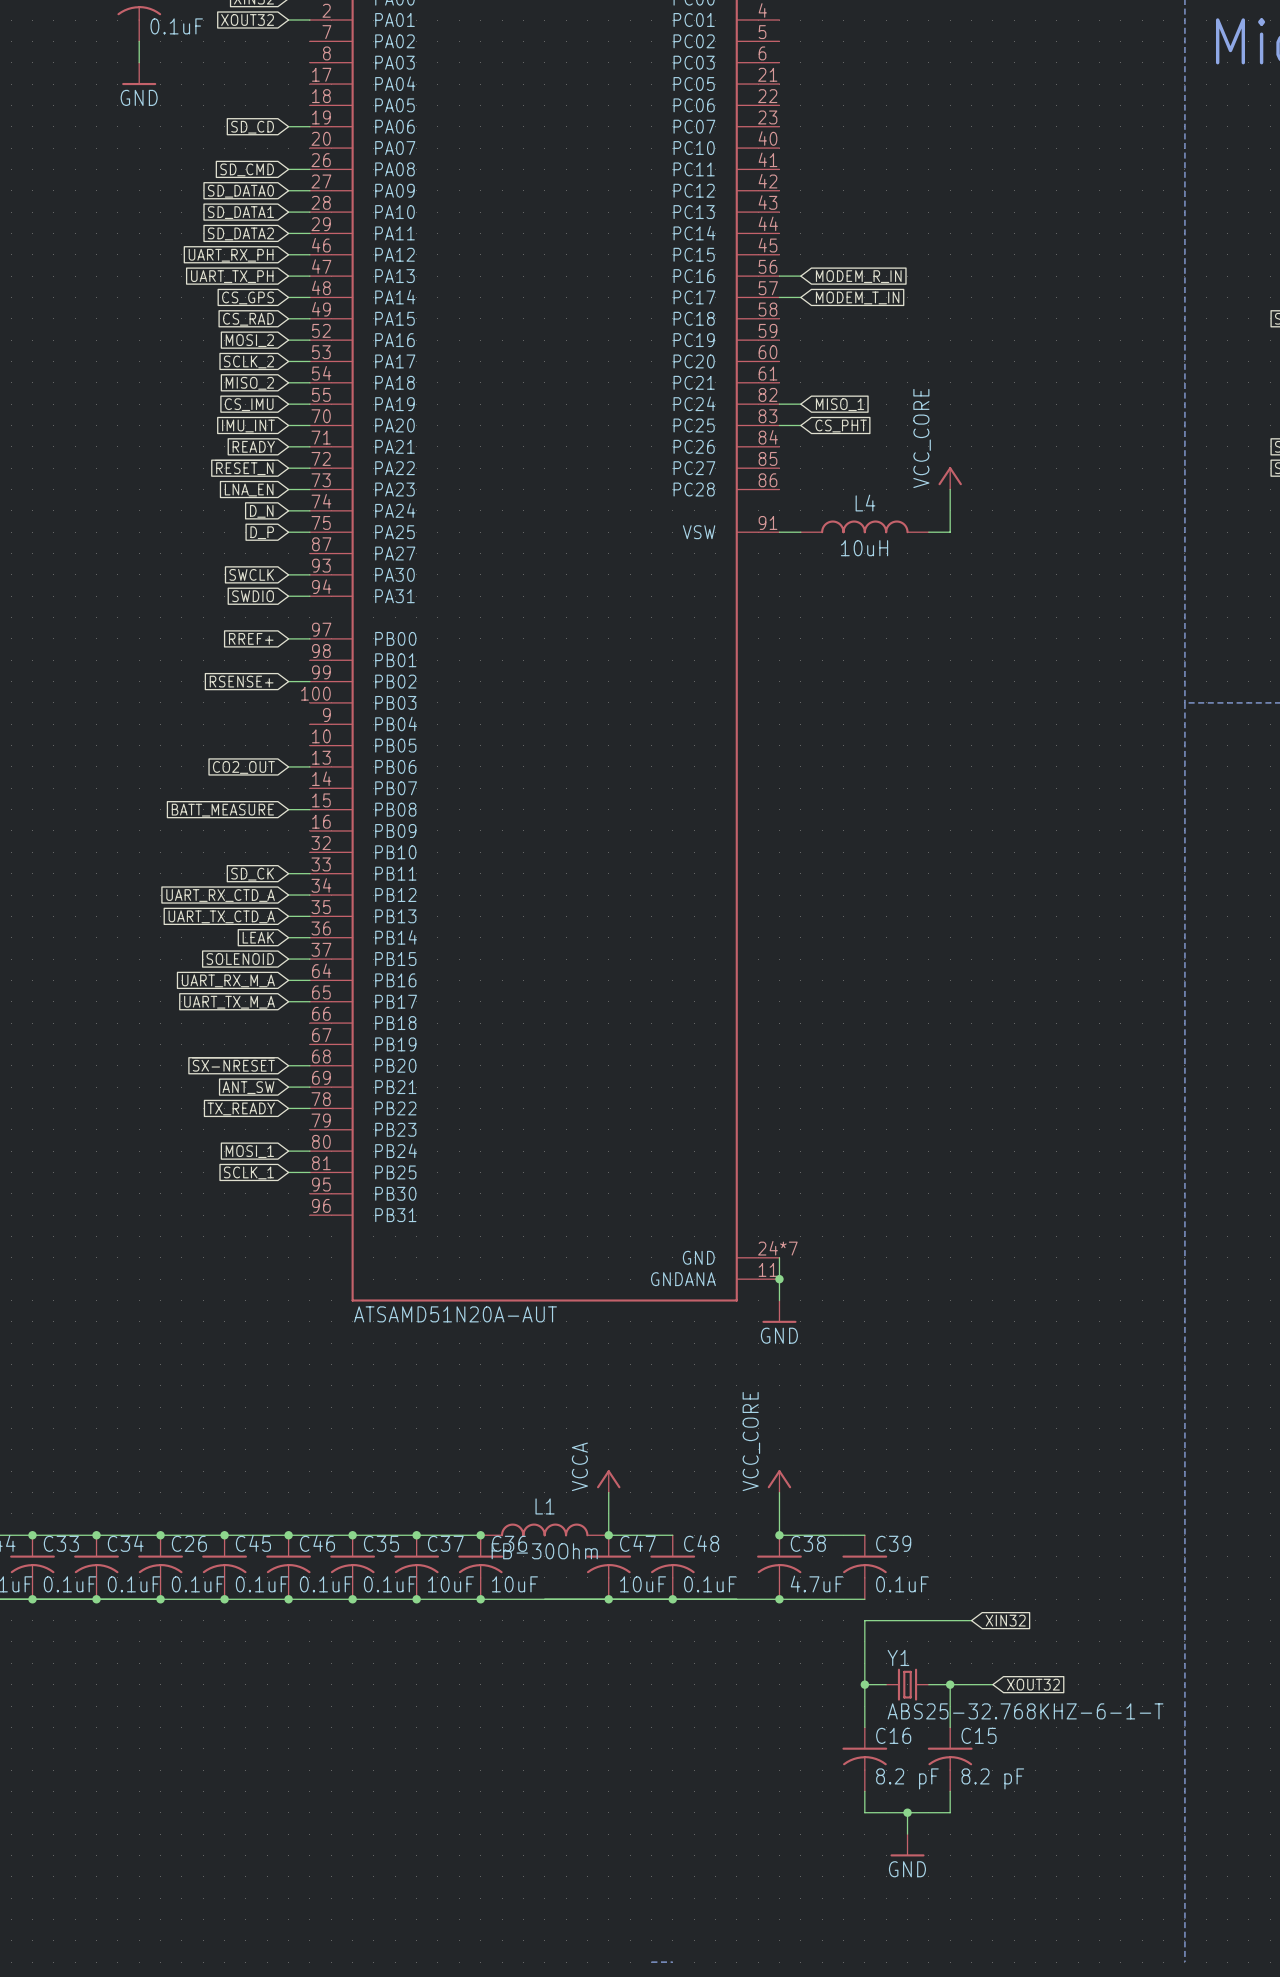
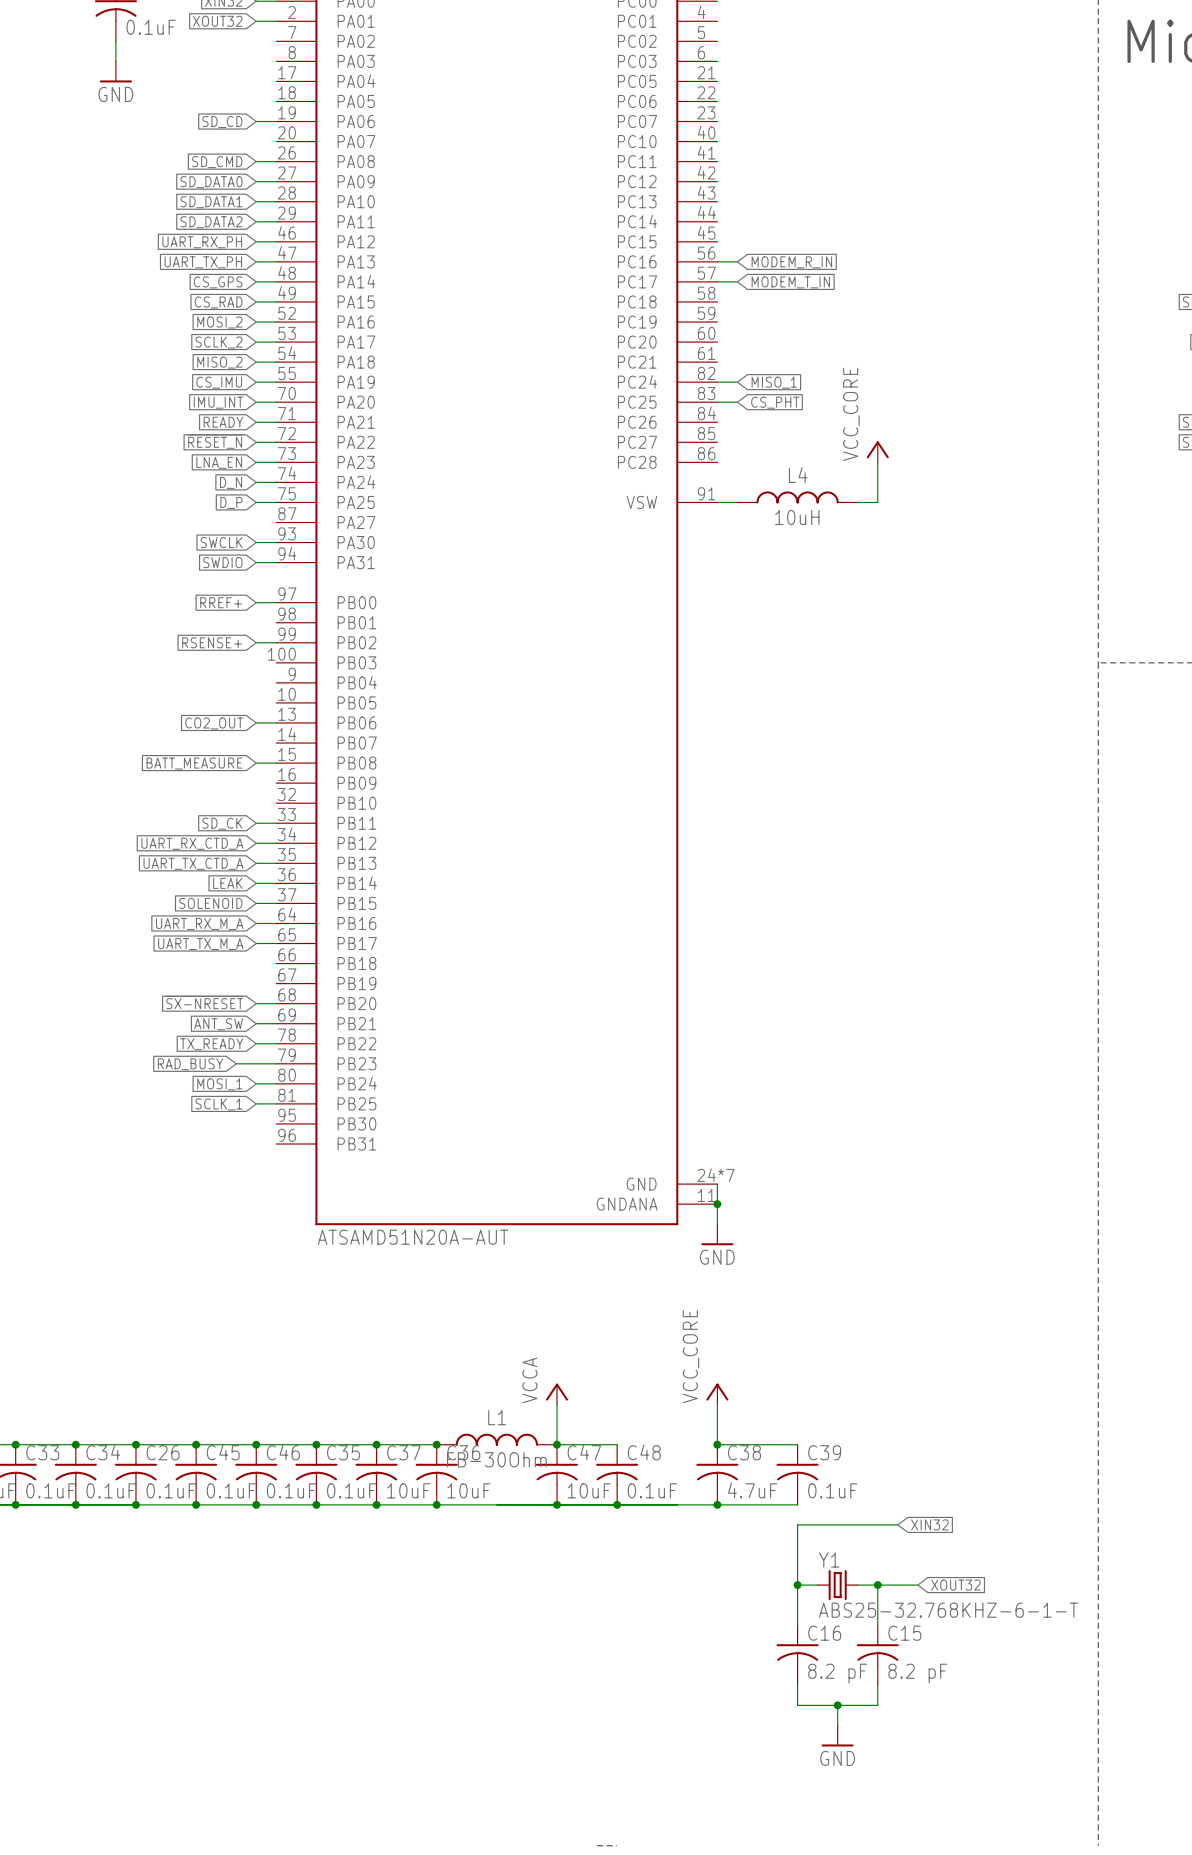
wire: none -> (236, 1063) (276, 1063)
global label: none -> RAD_BUSY (190, 1064)

